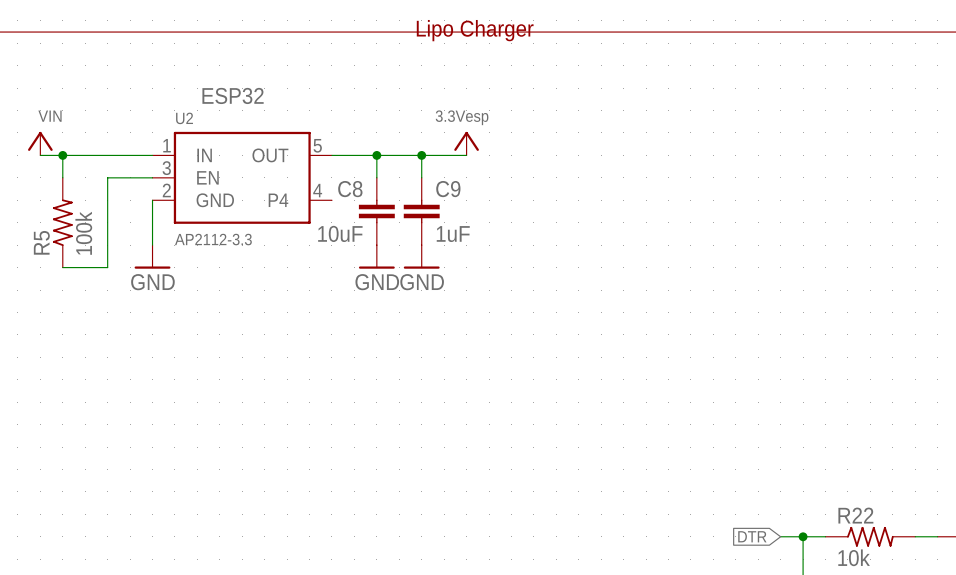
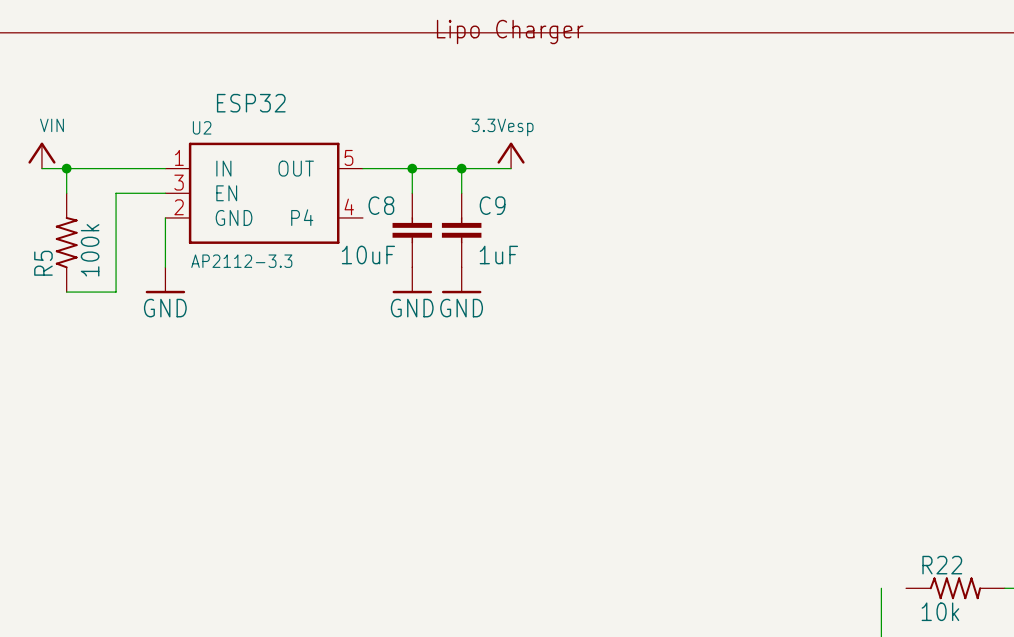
global label: DTR (752, 536) -> none
wire: (780, 536) (825, 536) -> none
junction: (803, 536) -> none

